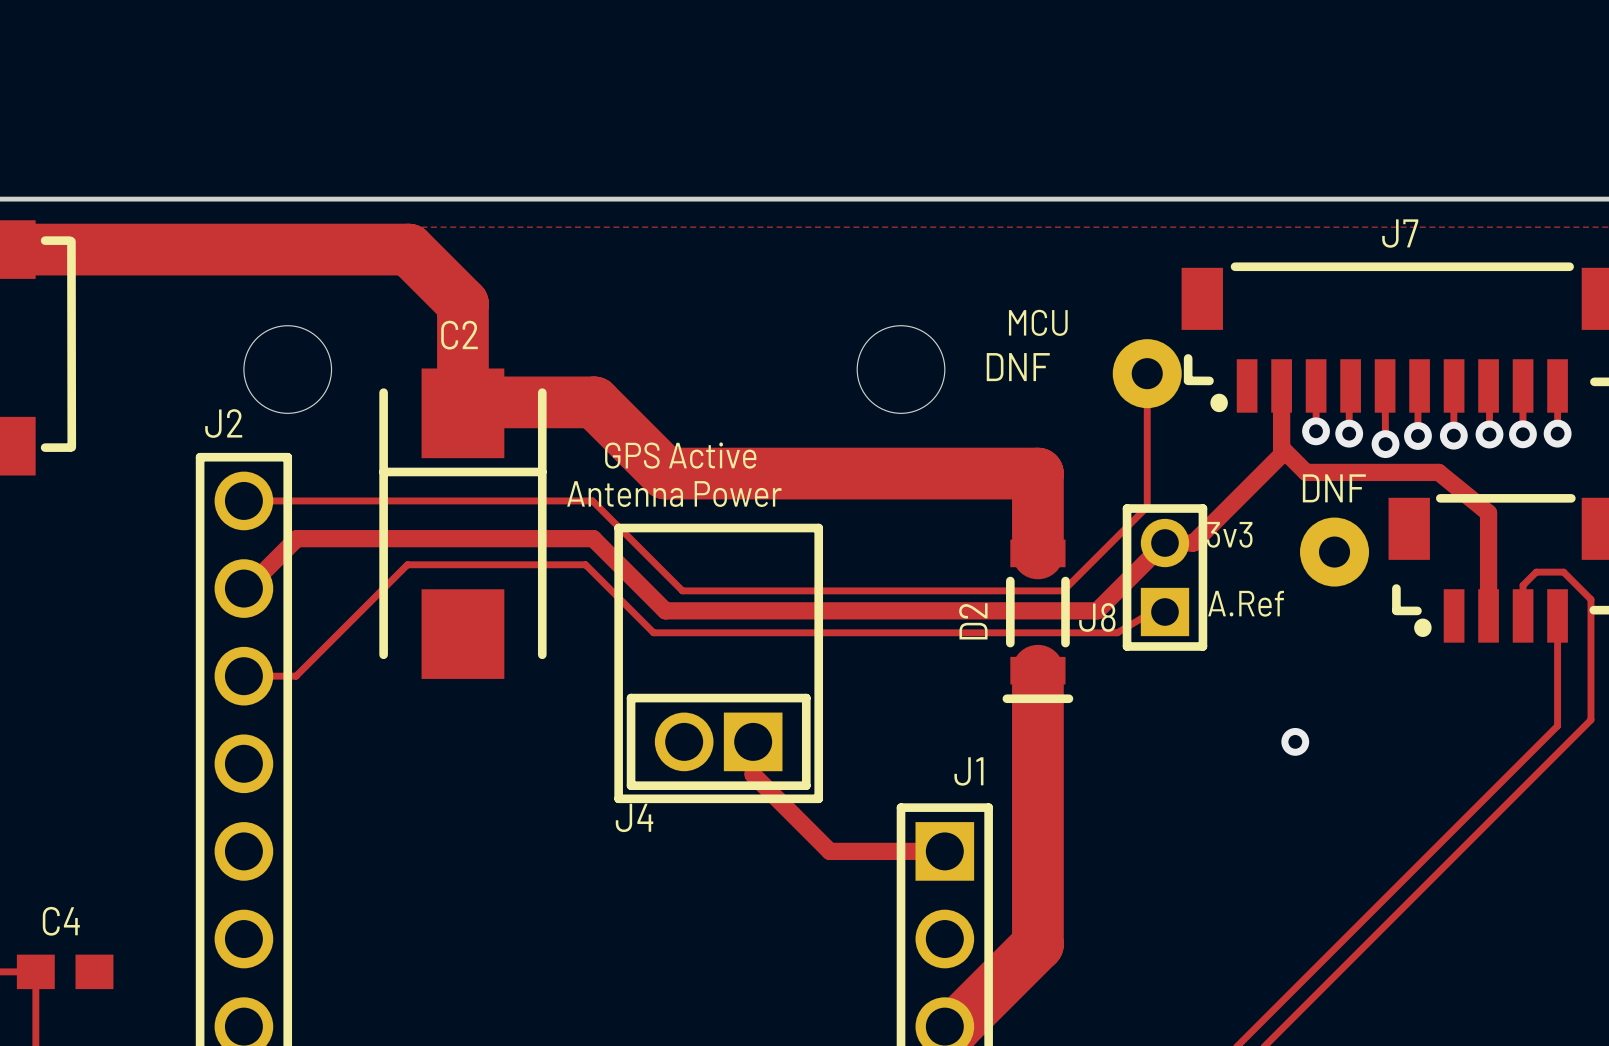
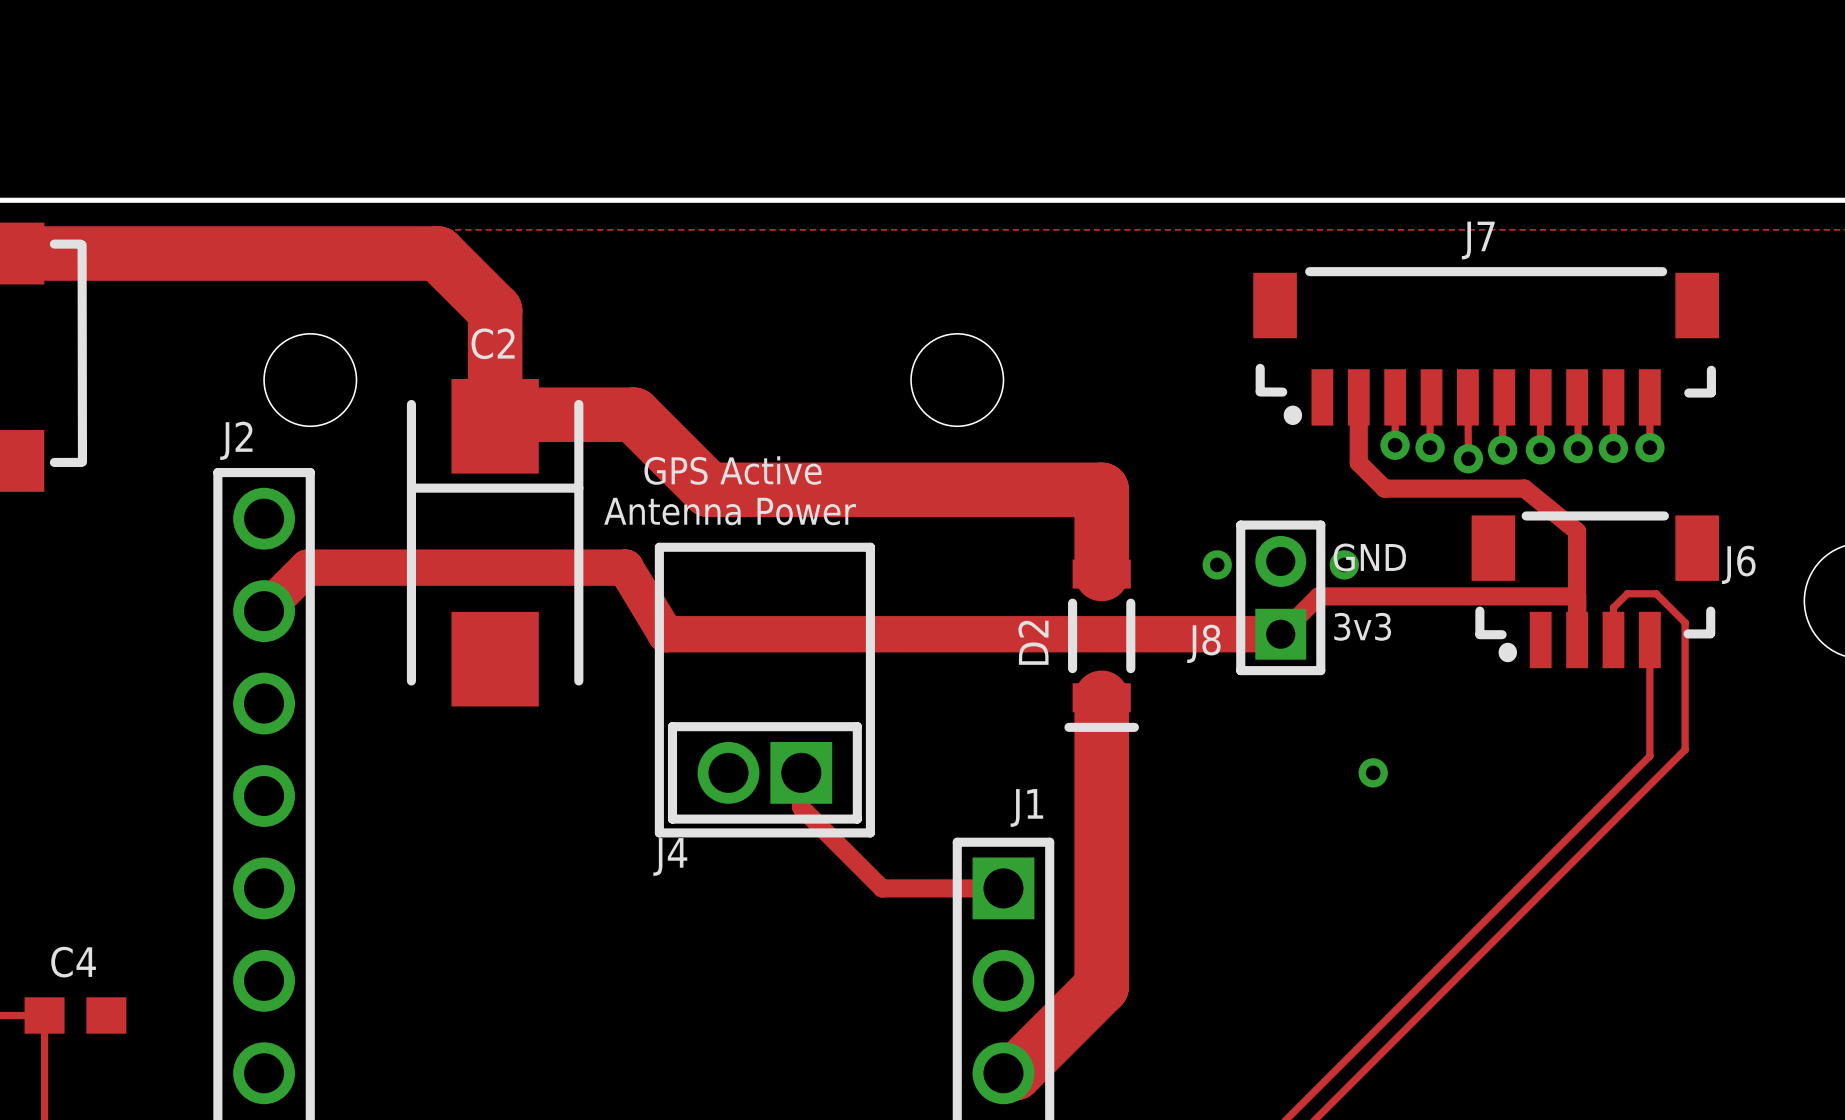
text: MCU (1038, 322) -> none
track: (1147, 373) (1147, 506) (1063, 590) (682, 590) (592, 500) (243, 500) -> none
part: DNF (1147, 373) -> none
track: (1281, 447) (1281, 454) (1193, 543) (1164, 543) (1097, 610) (665, 610) (593, 538) (296, 538) (246, 588) (243, 588) -> (1577, 596) (1318, 596) (1280, 634) (665, 634) (625, 567) (307, 567) (264, 611)
text position: 3v3 (1229, 534) -> 3v3 (1362, 626)
text: none -> GND (1369, 557)
via: none -> (1217, 564)
via: none -> (1344, 564)
part: DNF (1334, 552) -> none
J8 position: (1164, 577) -> (1280, 597)
text: A.Ref (1246, 603) -> none
track: (1164, 612) (1152, 612) (1117, 632) (653, 632) (585, 564) (407, 564) (296, 676) (243, 676) -> none

